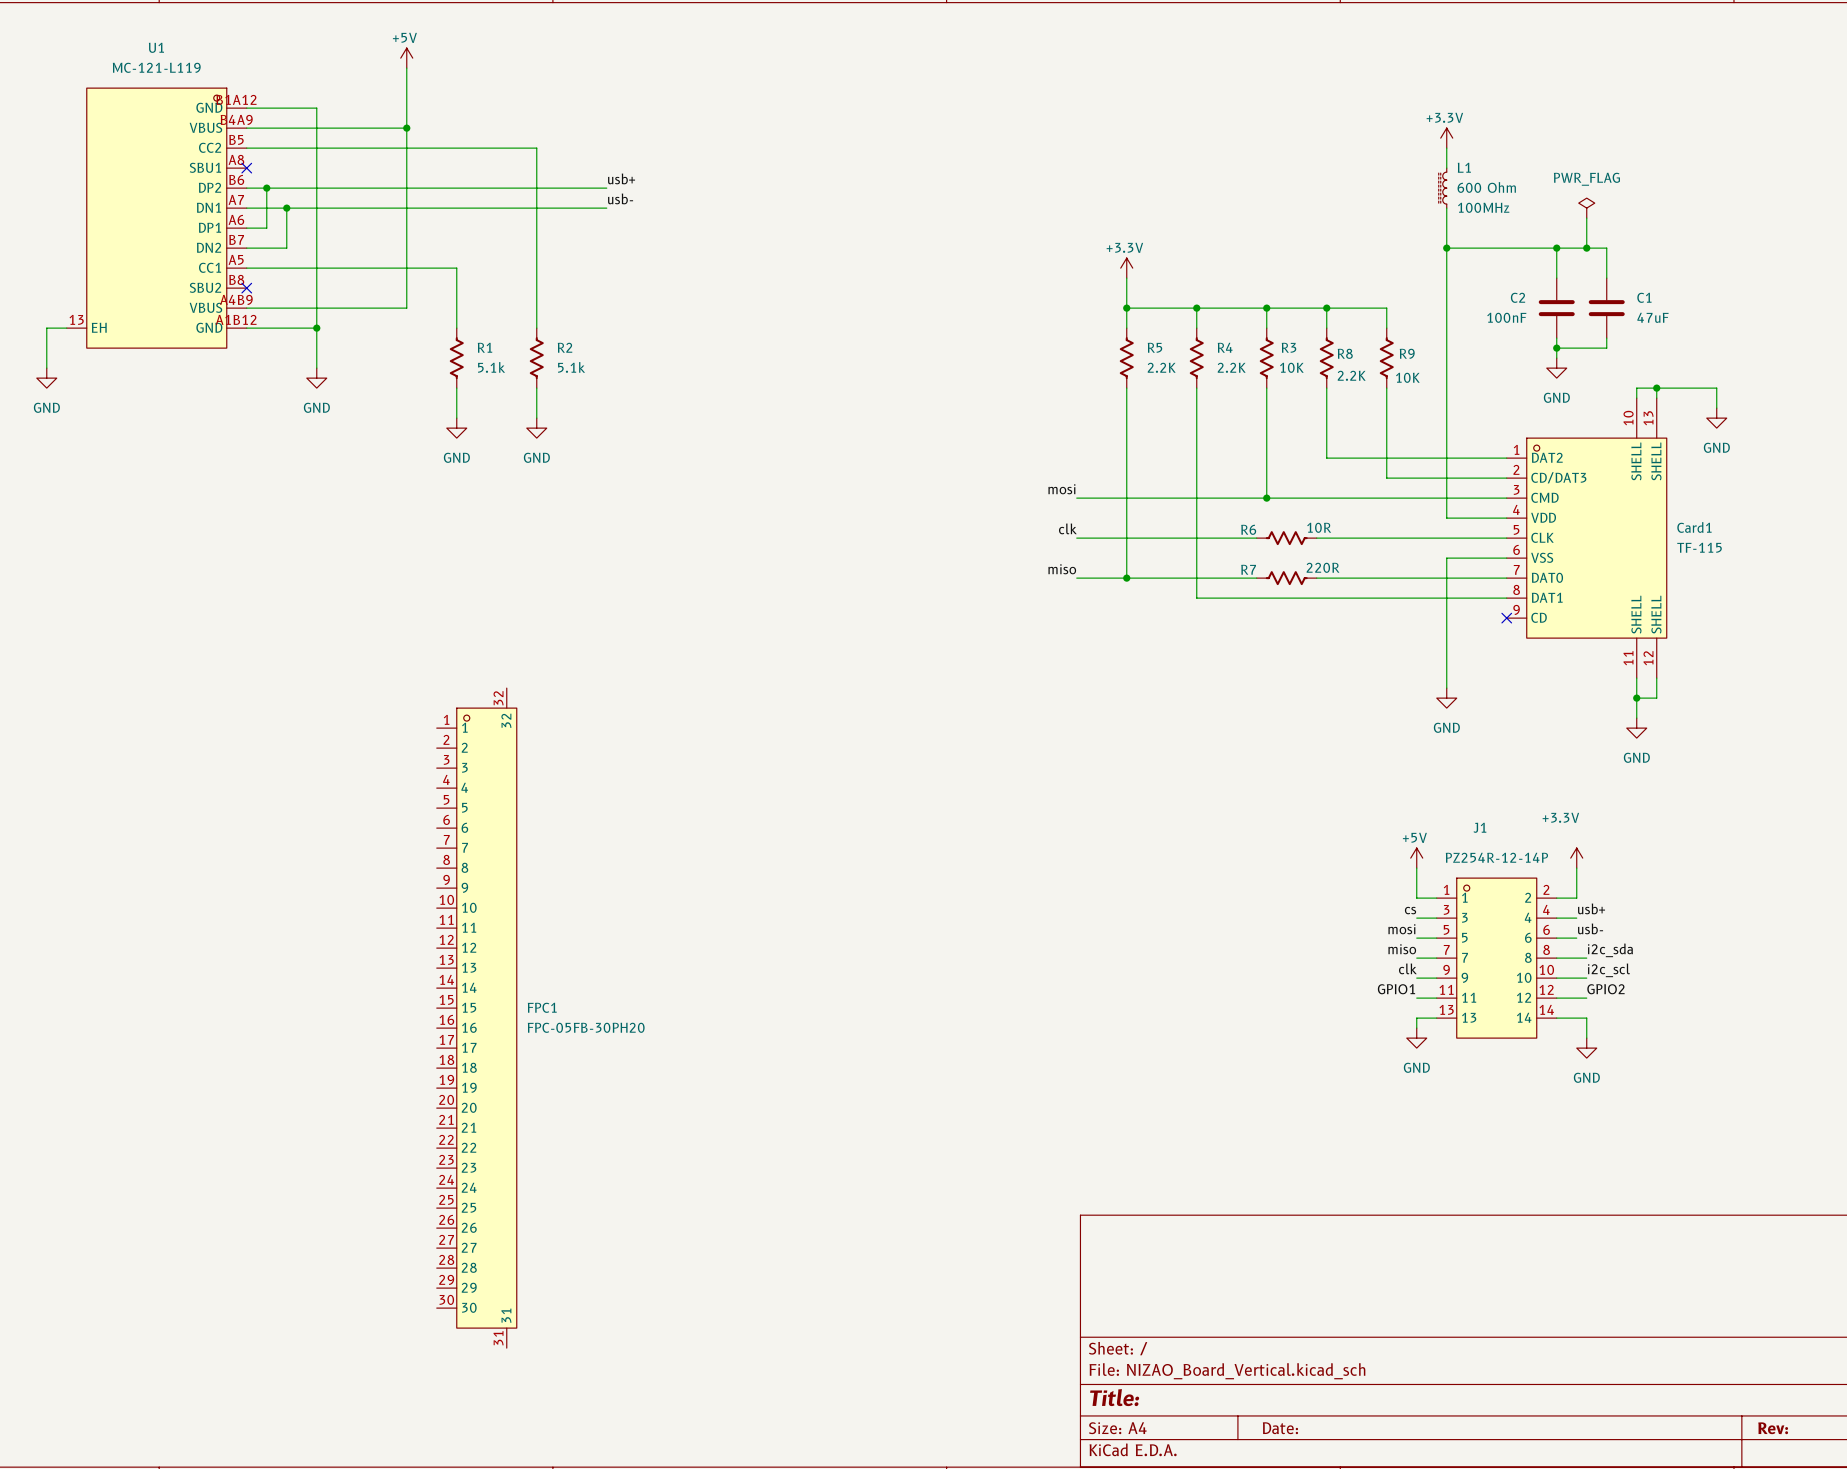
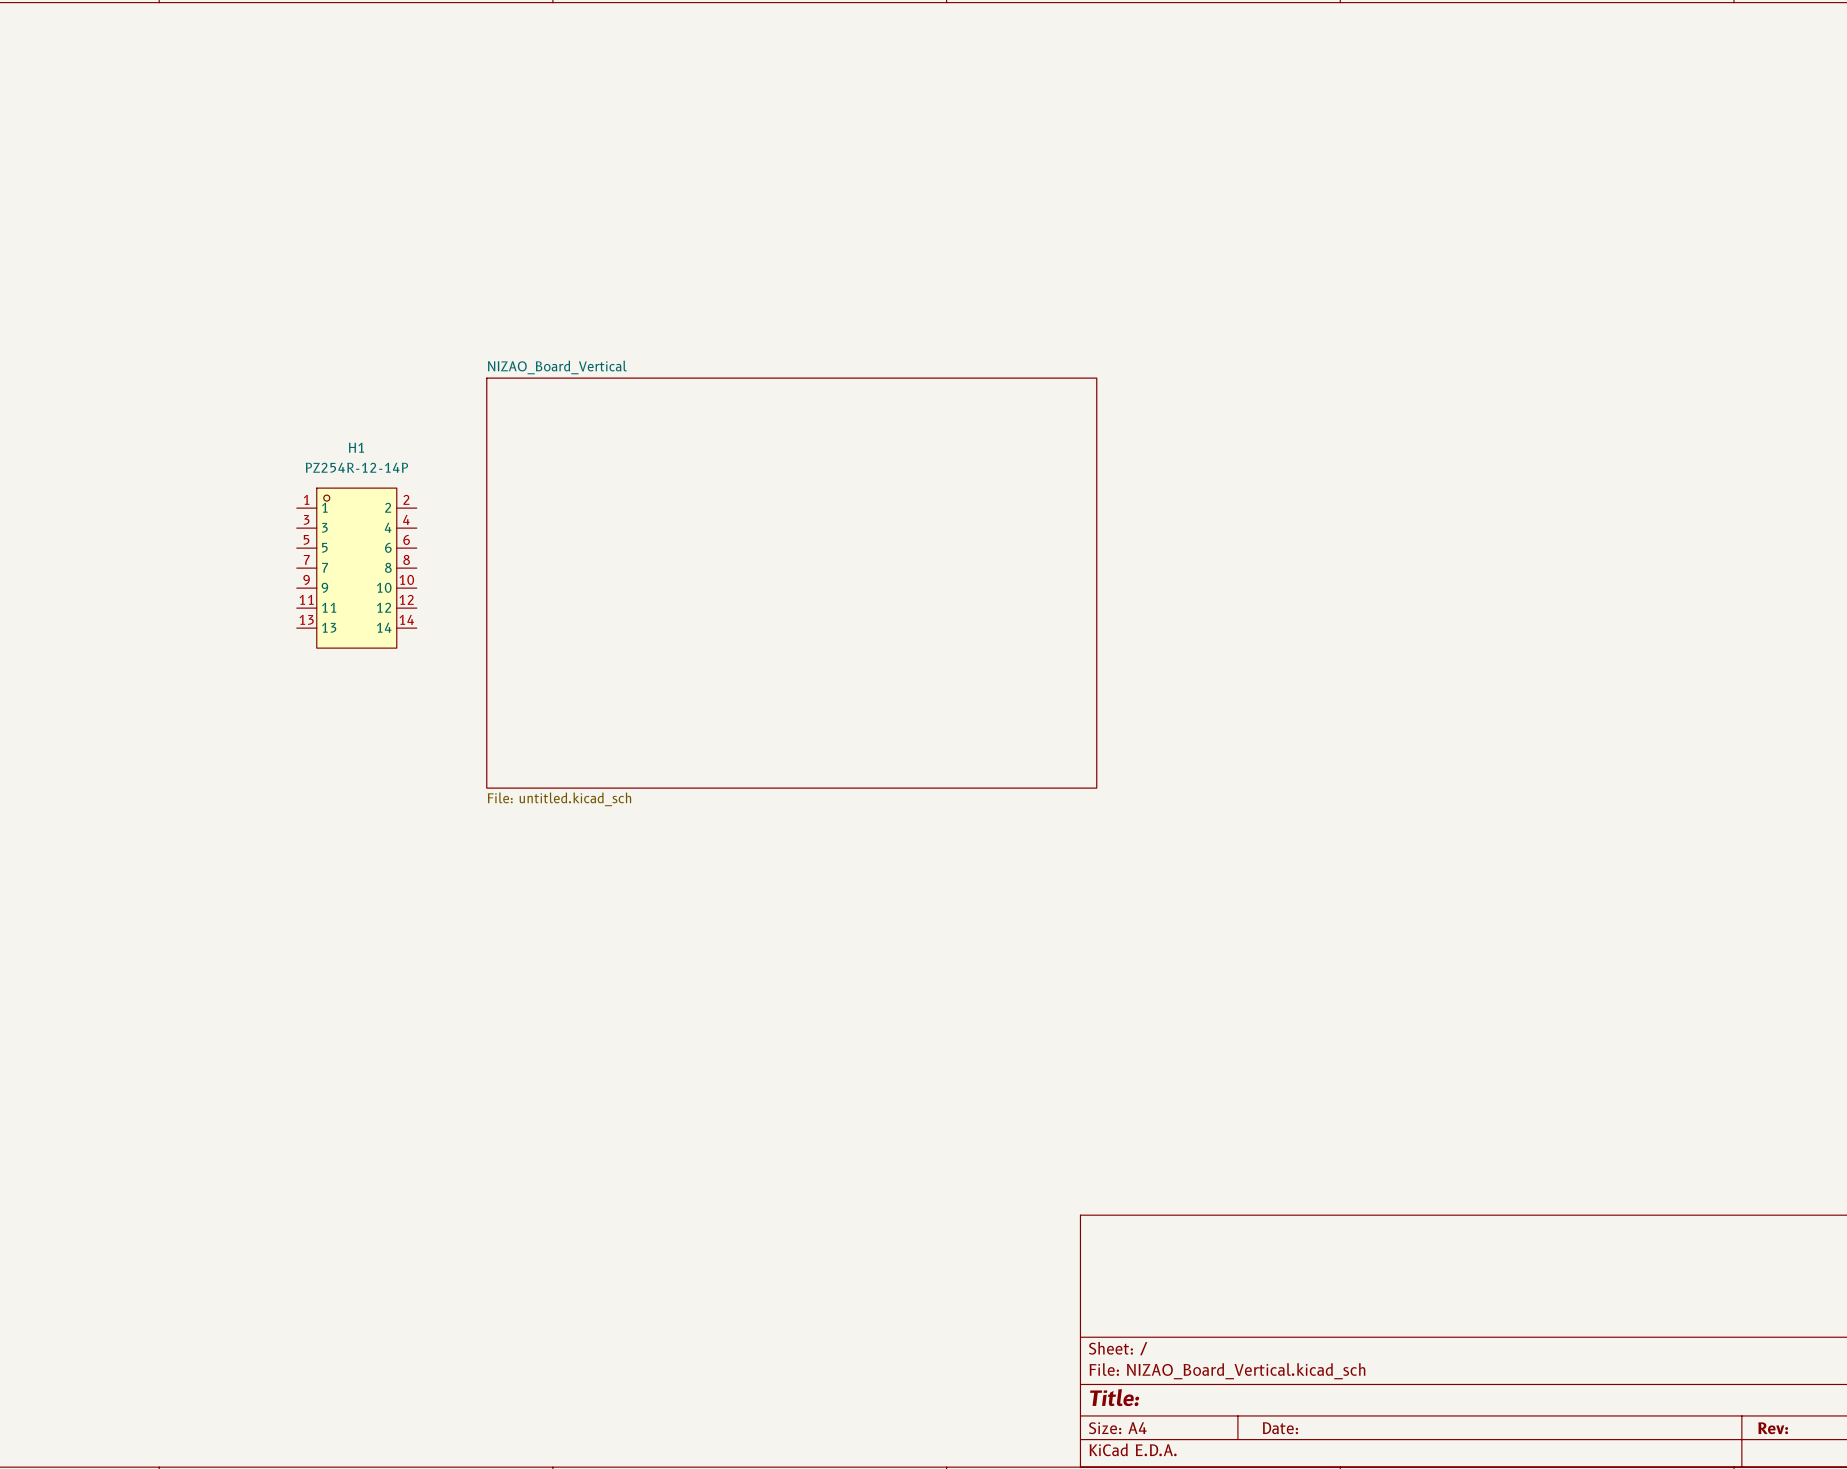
power symbol: +5V (406, 58) -> none
wire: (406, 68) (406, 308) (246, 308) -> none
wire: (246, 108) (316, 108) (316, 368) -> none
wire: (246, 128) (406, 128) -> none
junction: (406, 128) -> none
power symbol: +3.3V (1446, 138) -> none
wire: (246, 148) (536, 148) (536, 328) -> none
wire: (1446, 148) (1446, 168) -> none
no-connect mark: (246, 168) -> none
label: usb+ (621, 178) -> none
wire: (246, 188) (606, 188) -> none
wire: (266, 188) (266, 228) (246, 228) -> none
junction: (266, 188) -> none
L1: 600 Ohm (1442, 188) -> none
label: usb- (620, 198) -> none
wire: (246, 208) (606, 208) -> none
wire: (286, 208) (286, 248) (246, 248) -> none
junction: (286, 208) -> none
wire: (1446, 208) (1446, 518) (1506, 518) -> none
power symbol: PWR_FLAG (1586, 208) -> none
U1: MC-121-L119 (156, 218) -> none
wire: (1586, 218) (1586, 248) -> none
wire: (1446, 248) (1606, 248) (1606, 278) -> none
junction: (1446, 248) -> none
wire: (1556, 248) (1556, 278) -> none
junction: (1556, 248) -> none
junction: (1586, 248) -> none
wire: (246, 268) (456, 268) (456, 328) -> none
power symbol: +3.3V (1126, 268) -> none
wire: (1126, 278) (1126, 328) -> none
no-connect mark: (246, 288) -> none
wire: (1126, 308) (1386, 308) (1386, 328) -> none
junction: (1126, 308) -> none
wire: (1196, 308) (1196, 328) -> none
junction: (1196, 308) -> none
wire: (1266, 308) (1266, 328) -> none
junction: (1266, 308) -> none
wire: (1326, 308) (1326, 328) -> none
junction: (1326, 308) -> none
C2: 100nF (1556, 308) -> none
C1: 47uF (1606, 308) -> none
wire: (66, 328) (46, 328) (46, 368) -> none
wire: (246, 328) (316, 328) -> none
junction: (316, 328) -> none
wire: (1556, 338) (1556, 358) -> none
wire: (1606, 338) (1606, 348) (1556, 348) -> none
junction: (1556, 348) -> none
R1: 5.1k (456, 358) -> none
R2: 5.1k (536, 358) -> none
R5: 2.2K (1126, 358) -> none
R4: 2.2K (1196, 358) -> none
R3: 10K (1266, 358) -> none
R8: 2.2K (1326, 358) -> none
R9: 10K (1386, 358) -> none
power symbol: GND (1556, 368) -> none
power symbol: GND (46, 378) -> none
power symbol: GND (316, 378) -> none
wire: (456, 388) (456, 418) -> none
wire: (536, 388) (536, 418) -> none
wire: (1126, 388) (1126, 578) -> none
wire: (1196, 388) (1196, 598) (1506, 598) -> none
wire: (1266, 388) (1266, 498) -> none
wire: (1326, 388) (1326, 458) (1506, 458) -> none
wire: (1386, 388) (1386, 478) (1506, 478) -> none
wire: (1656, 388) (1656, 398) -> none
junction: (1656, 388) -> none
wire: (1636, 398) (1636, 388) (1716, 388) (1716, 408) -> none
power symbol: GND (1716, 418) -> none
power symbol: GND (456, 428) -> none
power symbol: GND (536, 428) -> none
label: mosi (1061, 489) -> none
wire: (1076, 498) (1506, 498) -> none
junction: (1266, 498) -> none
label: clk (1067, 528) -> none
wire: (1076, 538) (1256, 538) -> none
R6: 10R (1286, 538) -> none
wire: (1316, 538) (1506, 538) -> none
Card1: TF-115 (1586, 538) -> none
wire: (1506, 558) (1446, 558) (1446, 688) -> none
H1: none -> PZ254R-12-14P (356, 568)
label: miso (1062, 569) -> none
wire: (1076, 578) (1256, 578) -> none
junction: (1126, 578) -> none
R7: 220R (1286, 578) -> none
wire: (1316, 578) (1506, 578) -> none
sheet NIZAO_Board_Vertical: none -> File: untitled.kicad_sch (791, 583)
no-connect mark: (1506, 618) -> none
wire: (1636, 678) (1636, 718) -> none
wire: (1656, 678) (1656, 698) (1636, 698) -> none
power symbol: GND (1446, 698) -> none
junction: (1636, 698) -> none
power symbol: GND (1636, 728) -> none
power symbol: +5V (1416, 858) -> none
power symbol: +3.3V (1576, 858) -> none
wire: (1416, 868) (1416, 898) (1436, 898) -> none
wire: (1576, 868) (1576, 898) (1556, 898) -> none
label: usb+ (1591, 908) -> none
label: cs (1410, 910) -> none
wire: (1416, 918) (1436, 918) -> none
wire: (1556, 918) (1576, 918) -> none
label: usb- (1590, 928) -> none
label: mosi (1401, 929) -> none
wire: (1416, 938) (1436, 938) -> none
wire: (1556, 938) (1576, 938) -> none
label: miso (1402, 949) -> none
label: i2c_sda (1610, 950) -> none
wire: (1416, 958) (1436, 958) -> none
J1: PZ254R-12-14P (1496, 958) -> none
wire: (1556, 958) (1586, 958) -> none
label: clk (1407, 968) -> none
label: i2c_scl (1609, 970) -> none
wire: (1416, 978) (1436, 978) -> none
wire: (1556, 978) (1586, 978) -> none
label: GPIO1 (1396, 989) -> none
label: GPIO2 (1605, 989) -> none
wire: (1416, 998) (1436, 998) -> none
wire: (1556, 998) (1586, 998) -> none
FPC1: FPC-05FB-30PH20 (476, 1018) -> none
wire: (1436, 1018) (1416, 1018) (1416, 1028) -> none
wire: (1556, 1018) (1586, 1018) (1586, 1038) -> none
power symbol: GND (1416, 1038) -> none
power symbol: GND (1586, 1048) -> none

